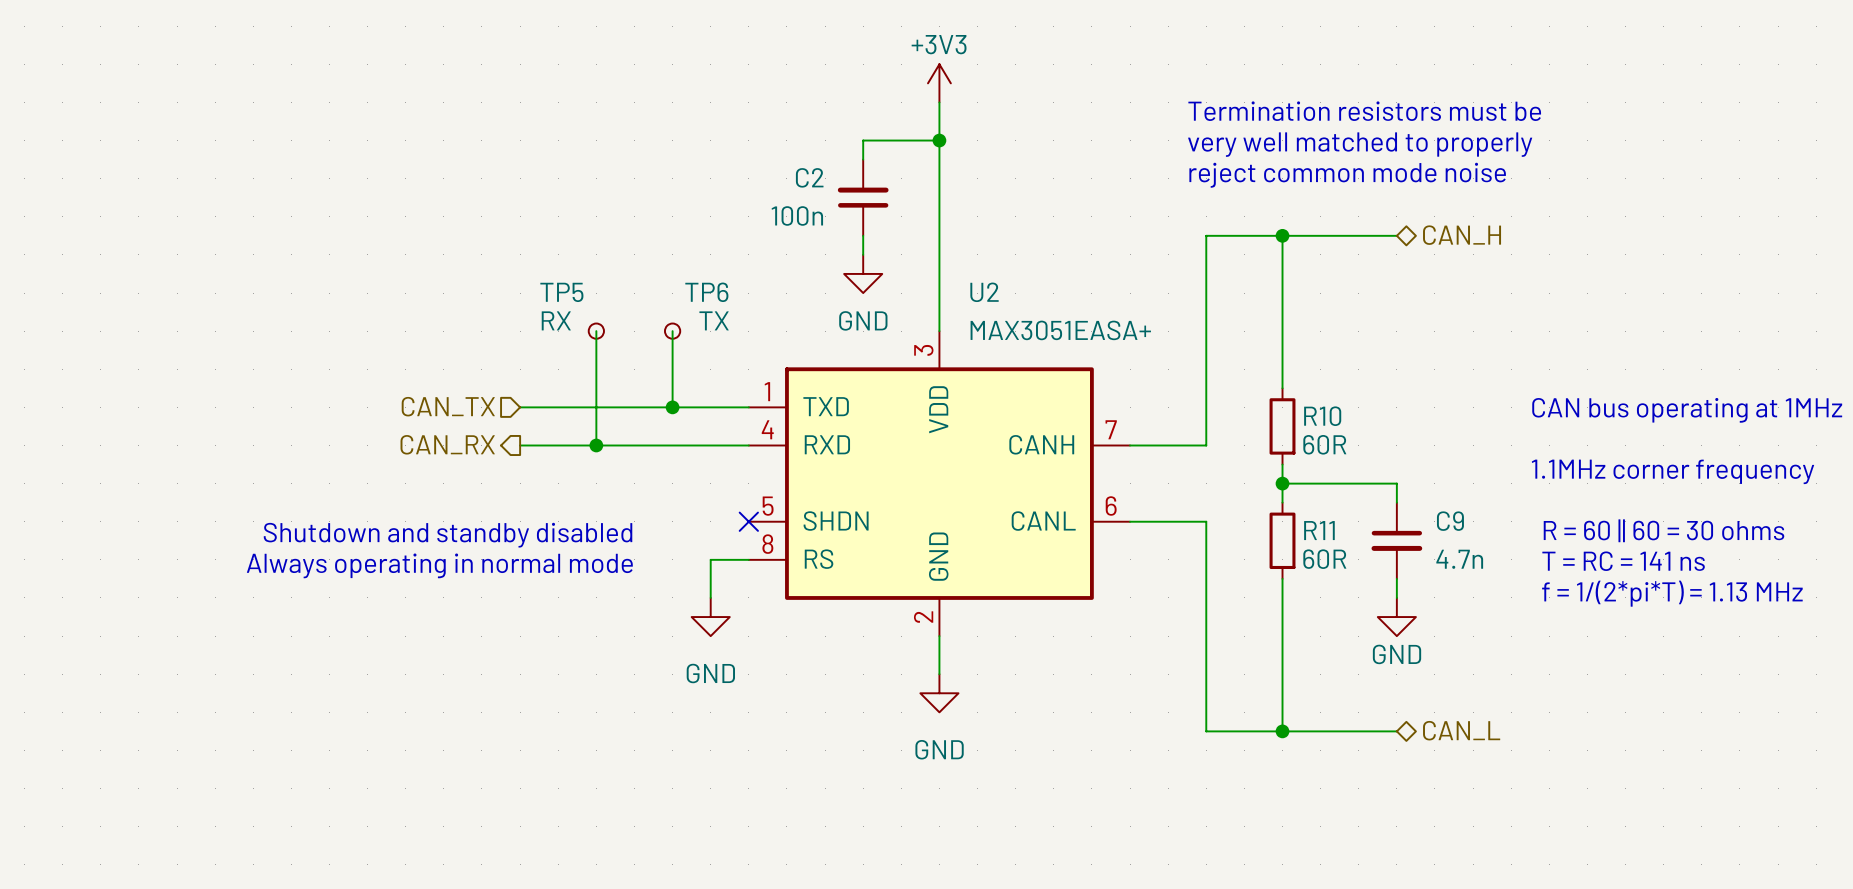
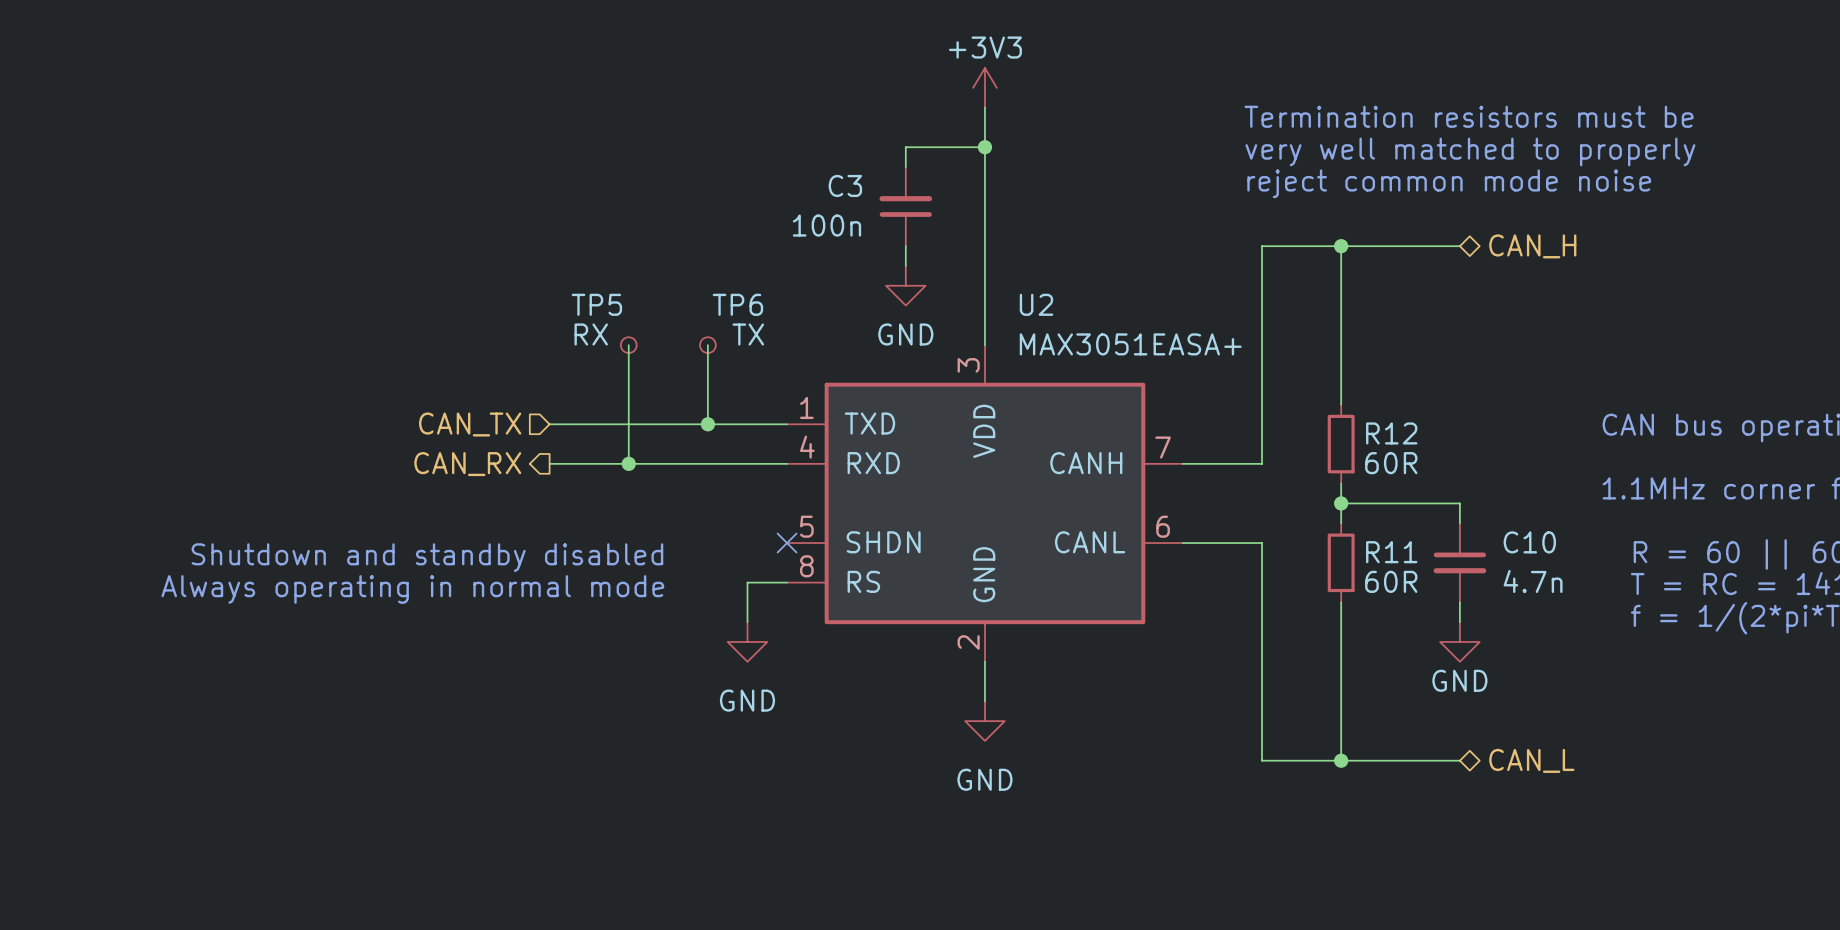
C2 name: C2 (809, 177) -> C3 (845, 185)
R10 name: R10 (1322, 416) -> R12 (1391, 433)
C9 name: C9 (1450, 521) -> C10 (1529, 542)

